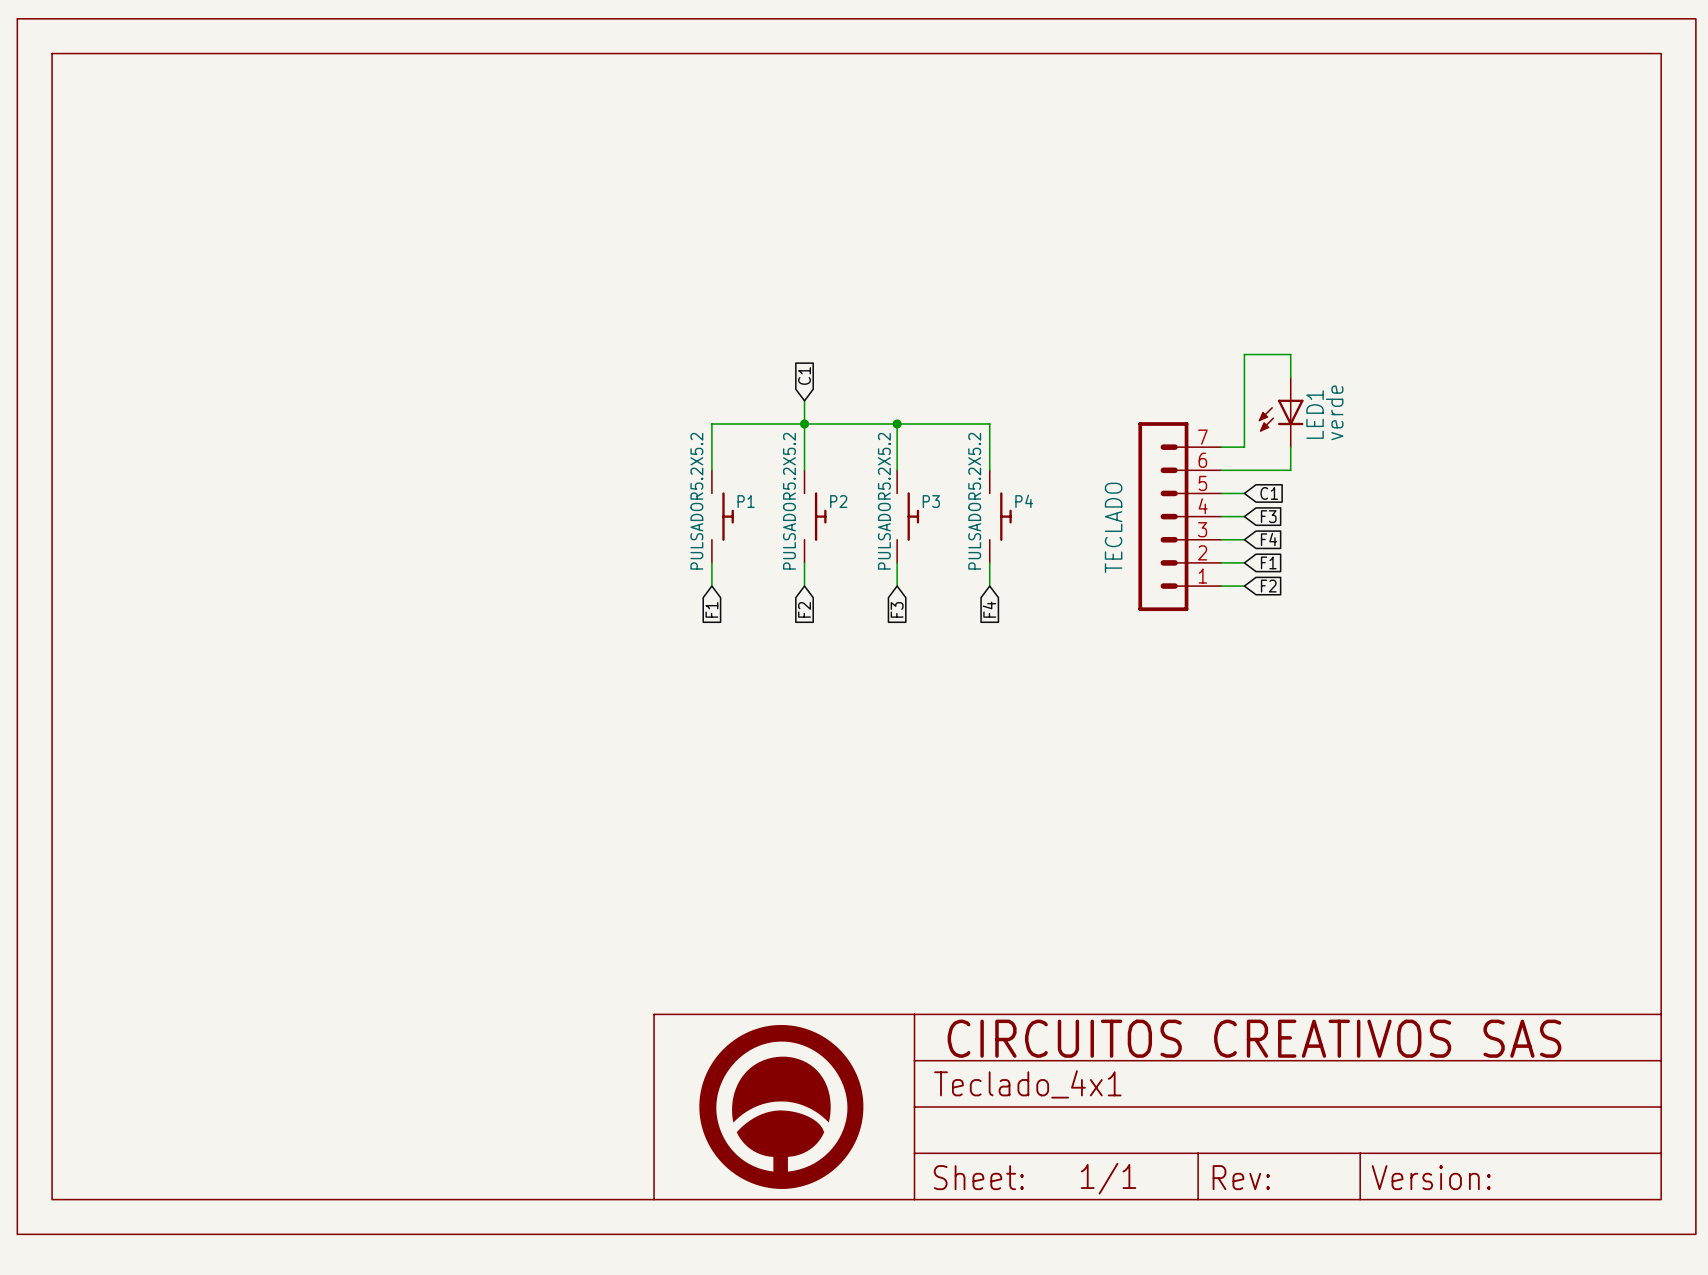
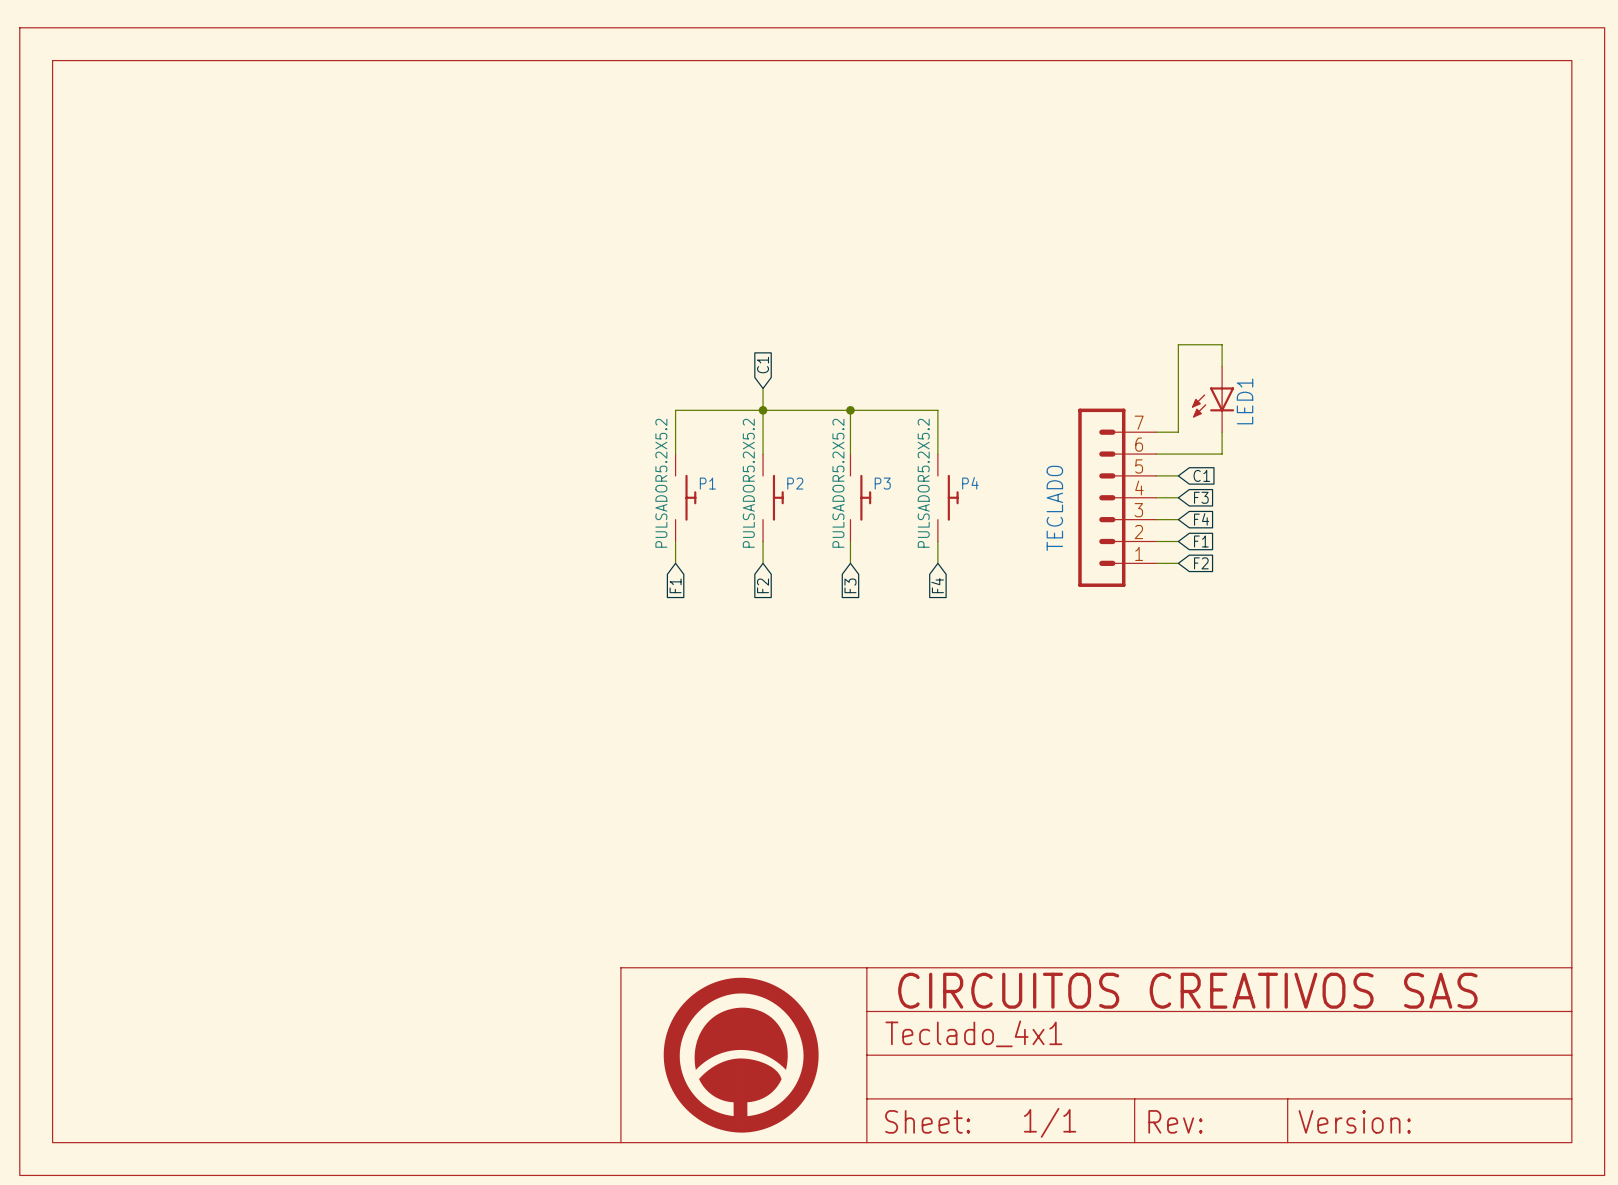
LED1 value: verde (1334, 412) -> none

